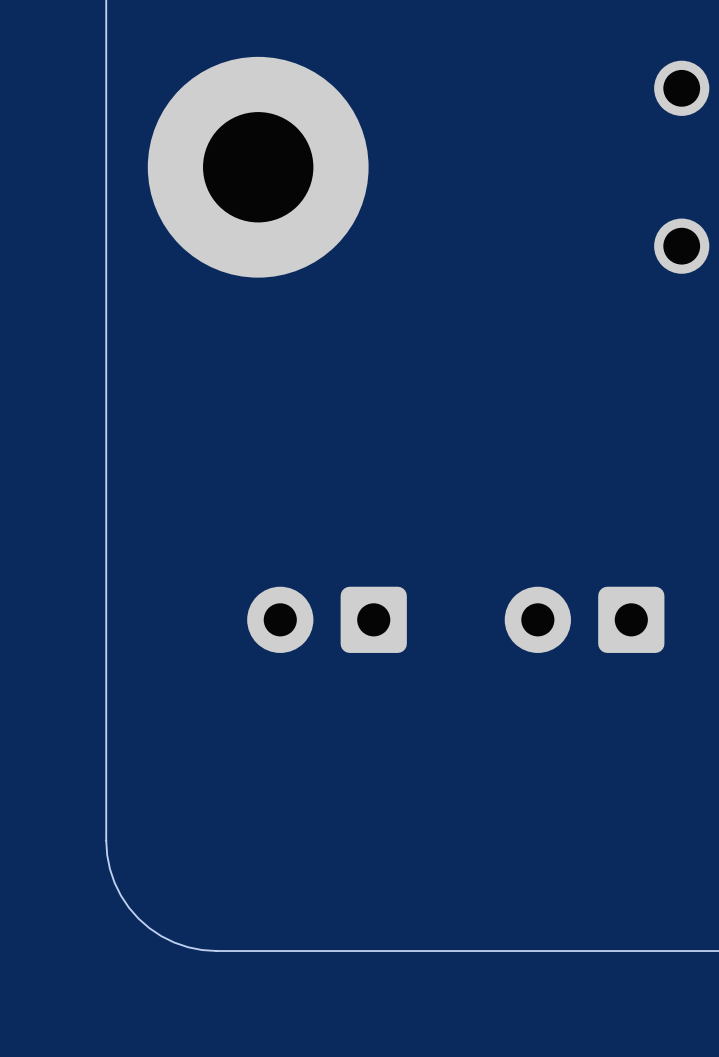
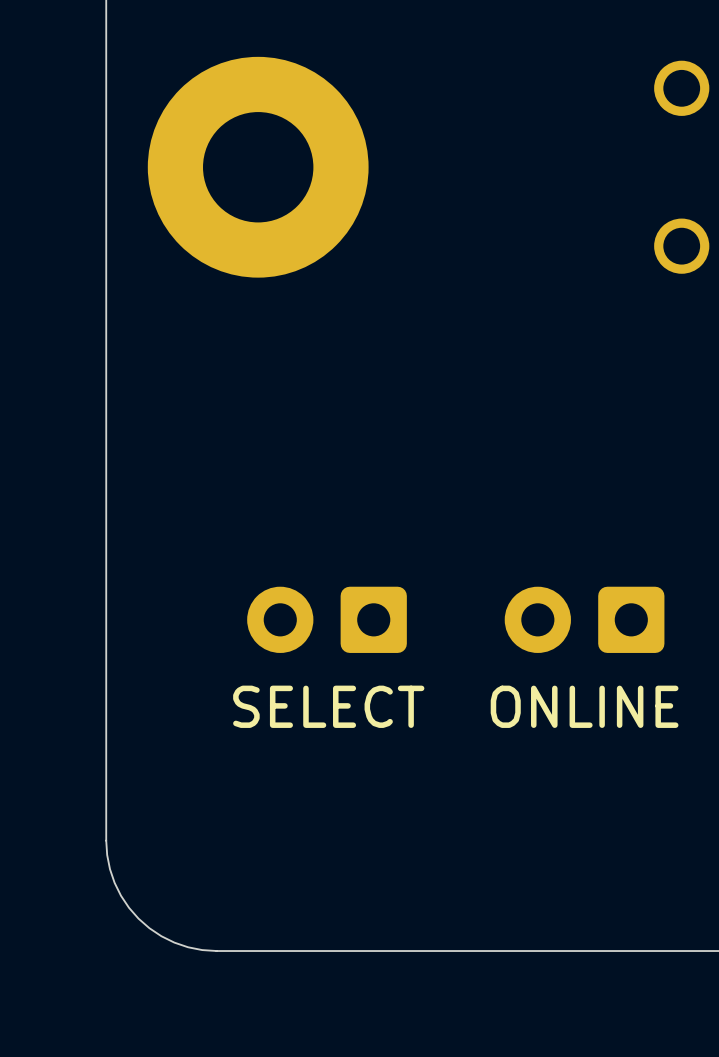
text: none -> SELECT (328, 706)
text: none -> ONLINE (584, 706)

